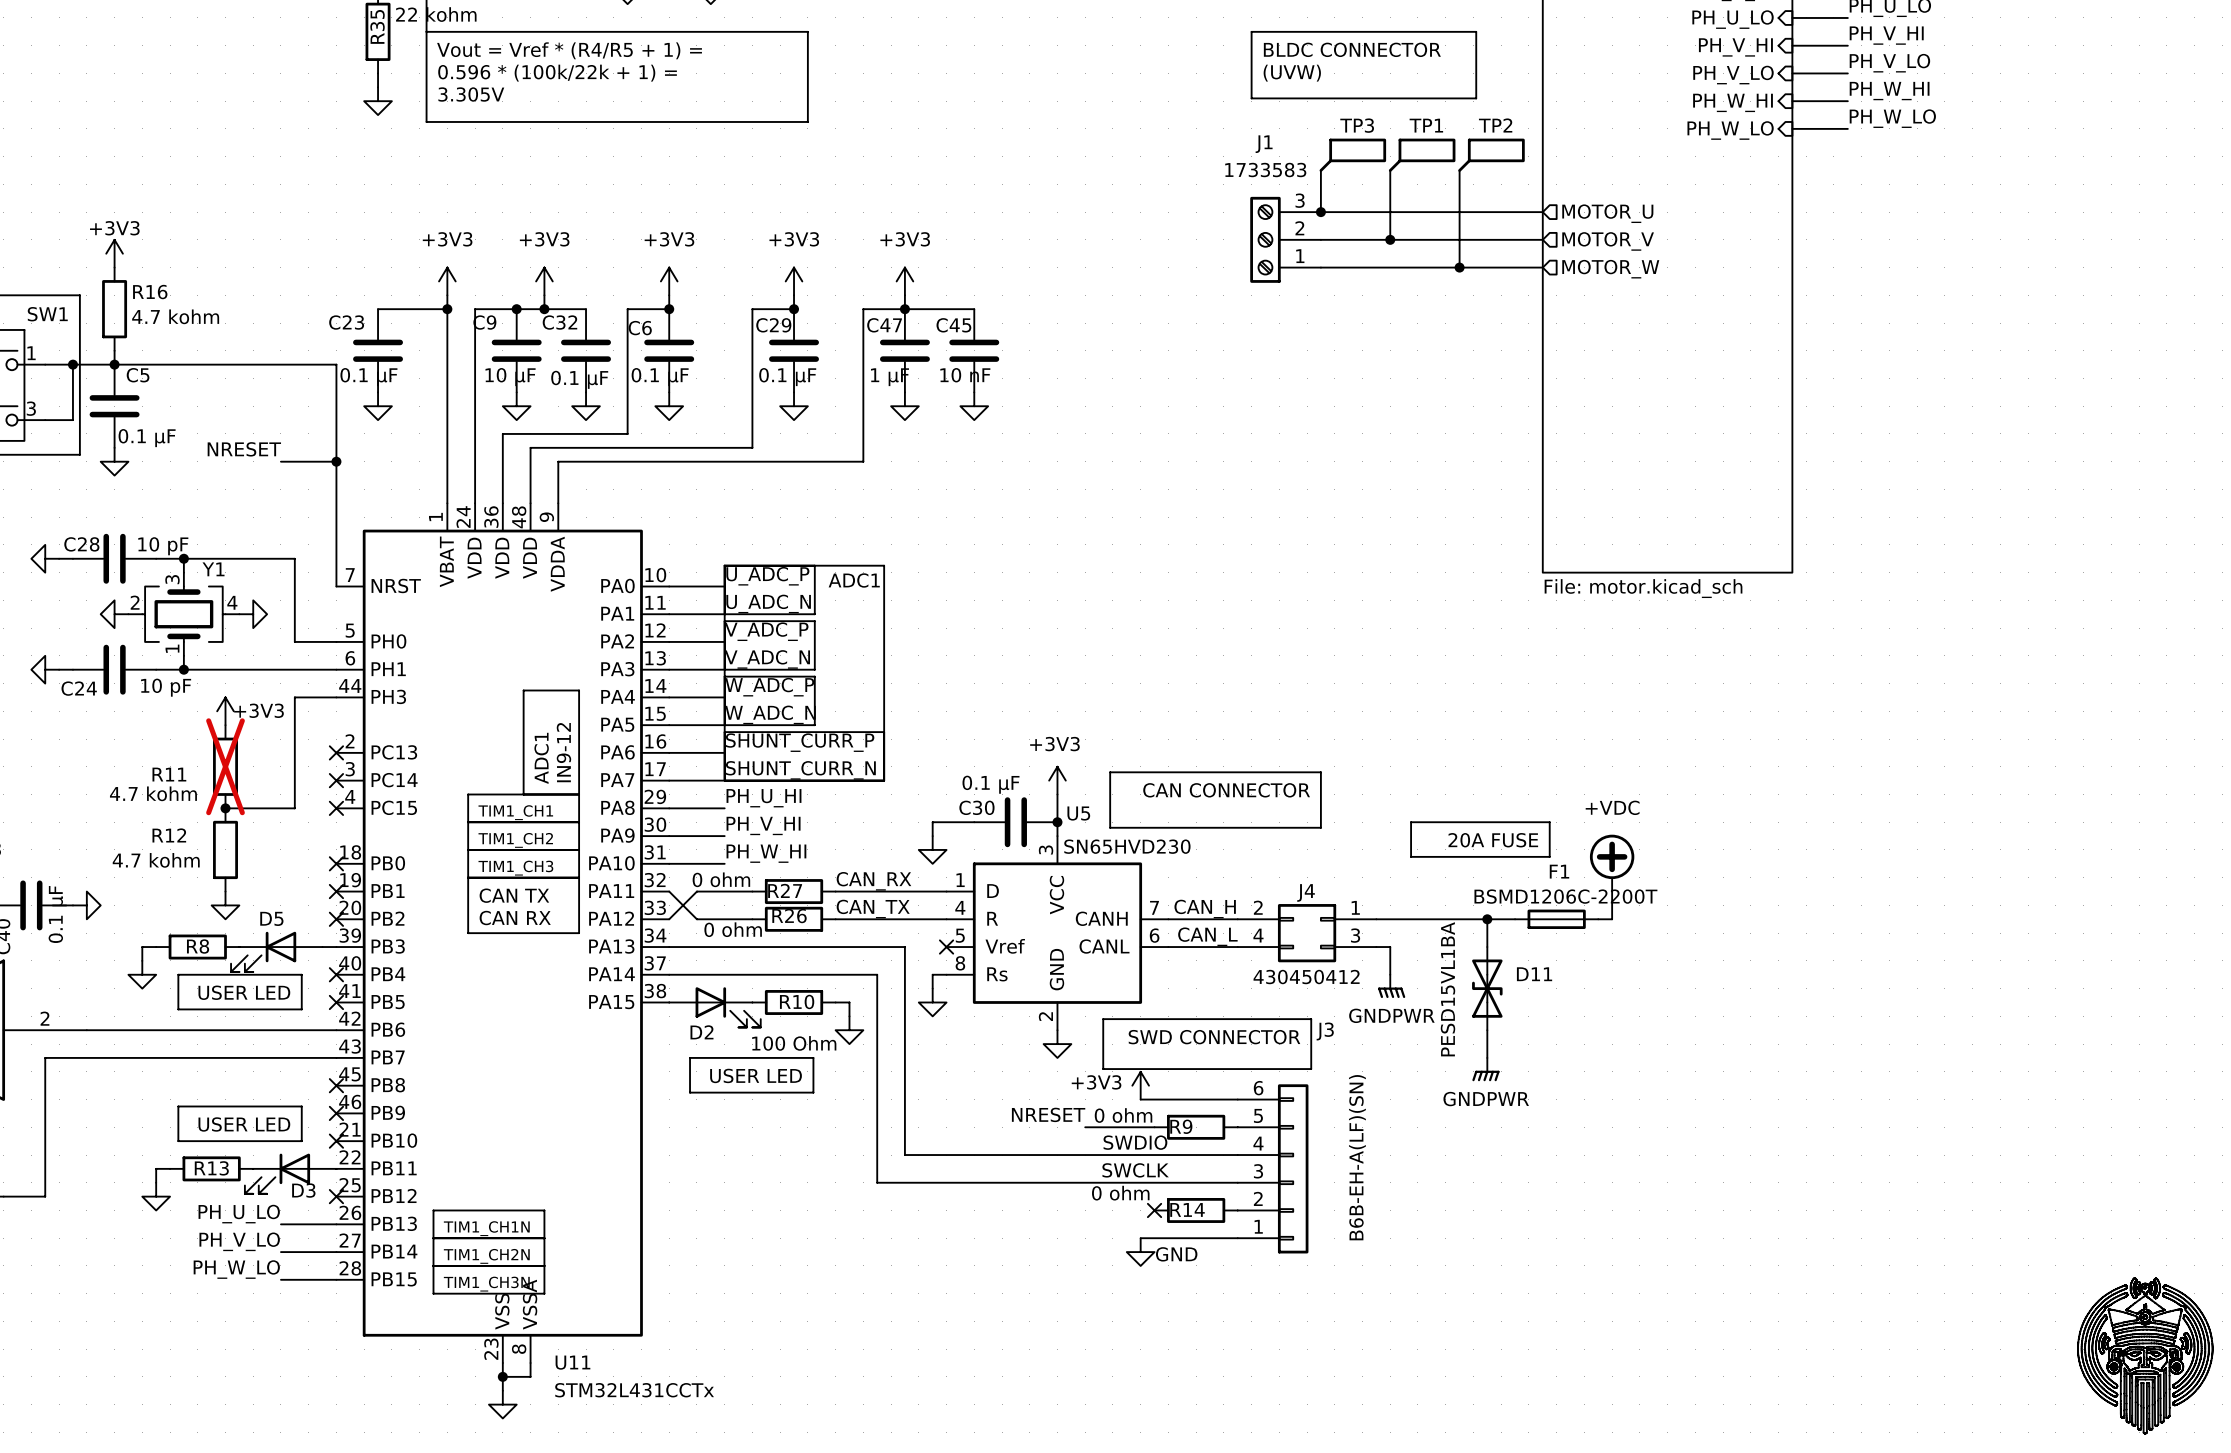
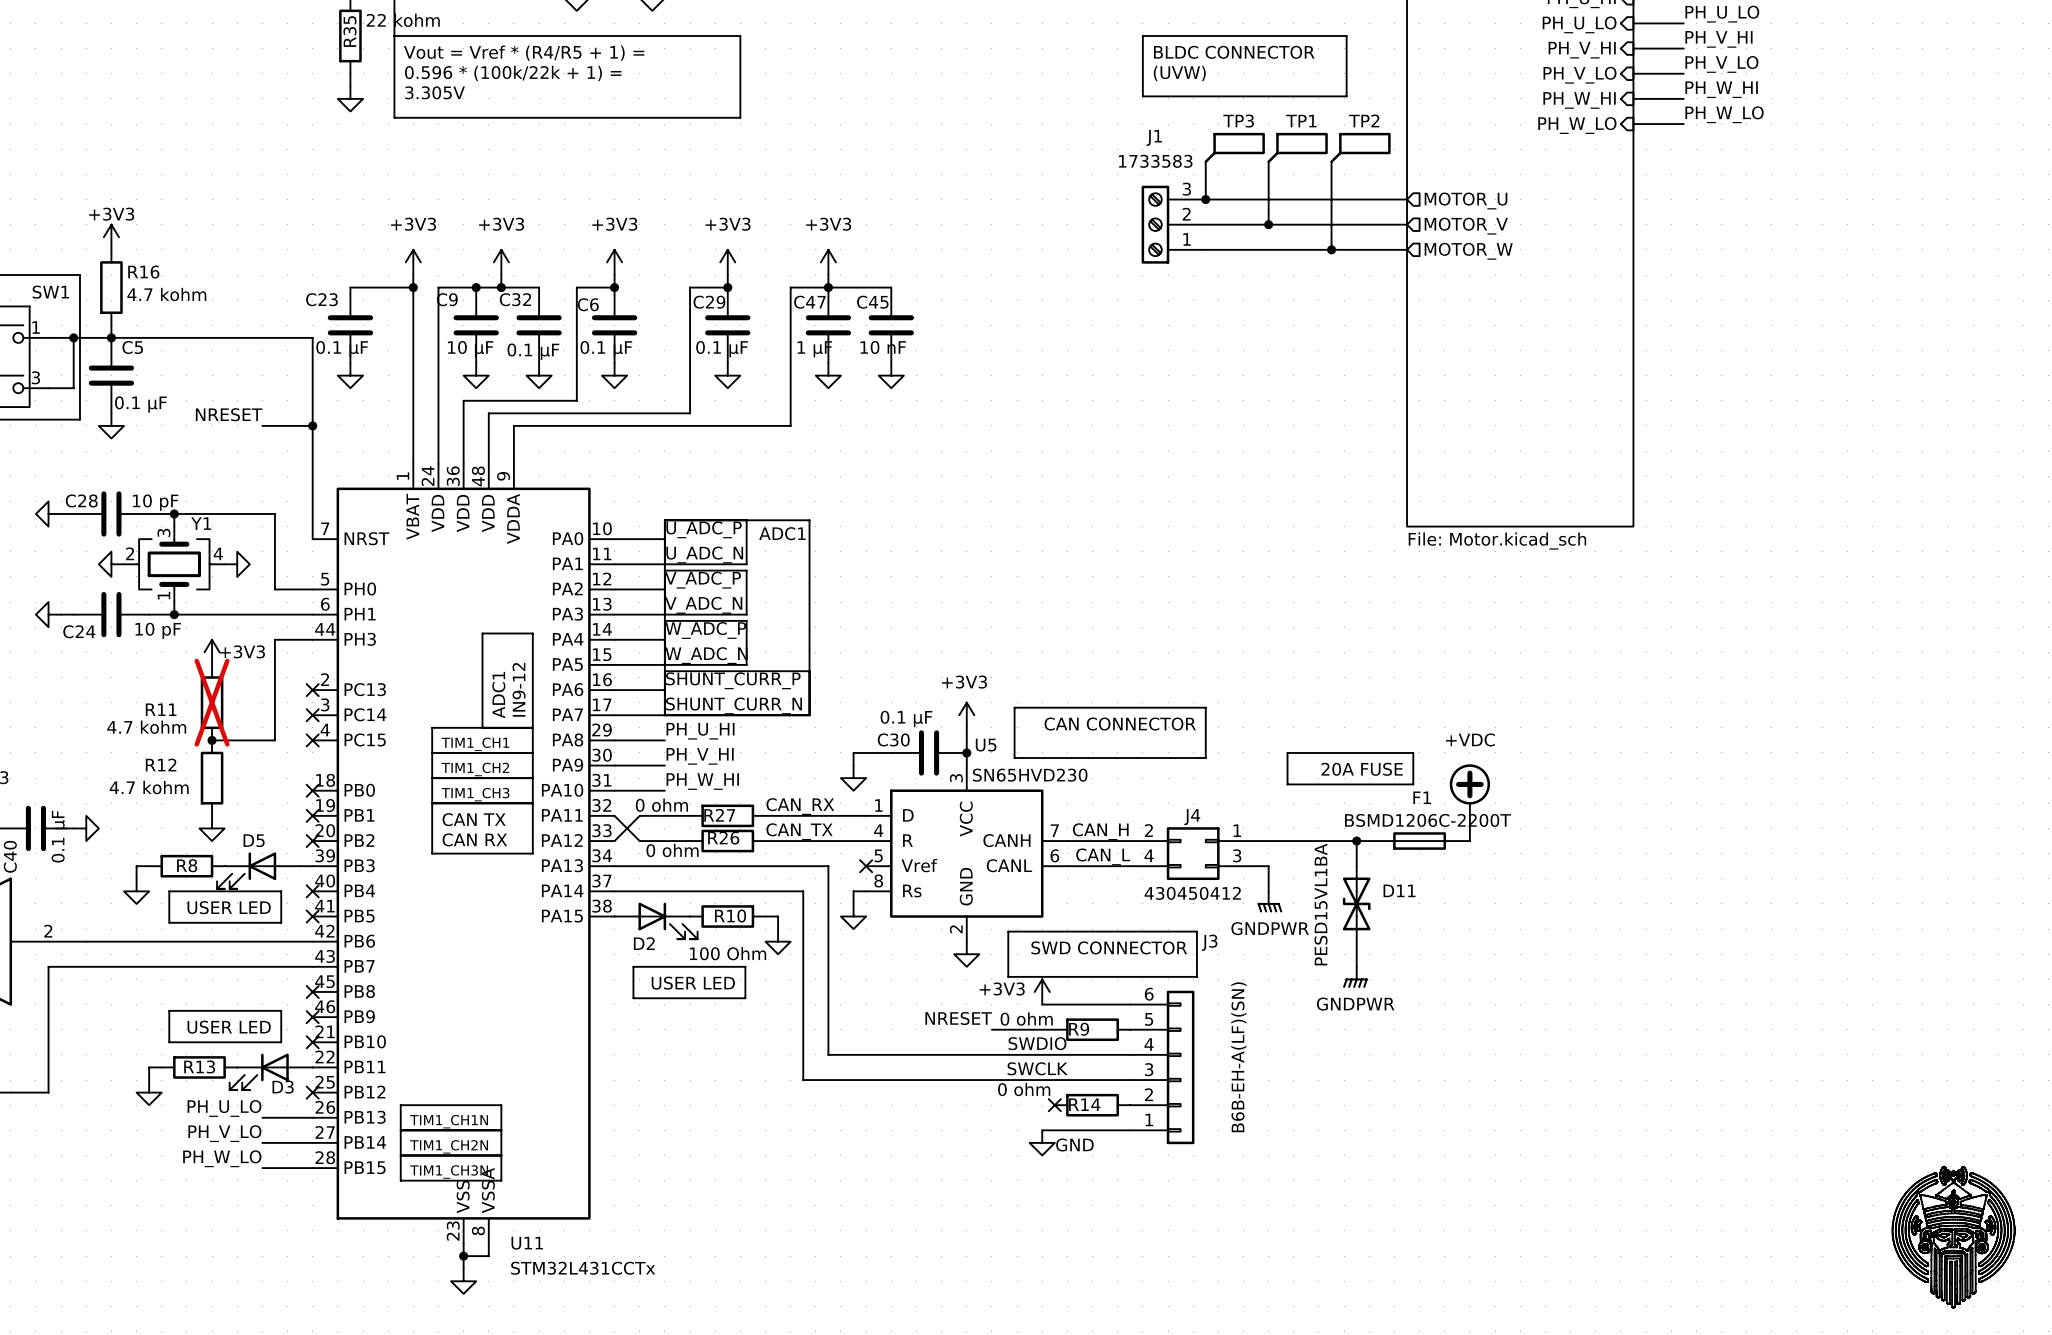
sheet value: File: motor.kicad_sch (1643, 588) -> File: Motor.kicad_sch (1497, 541)

